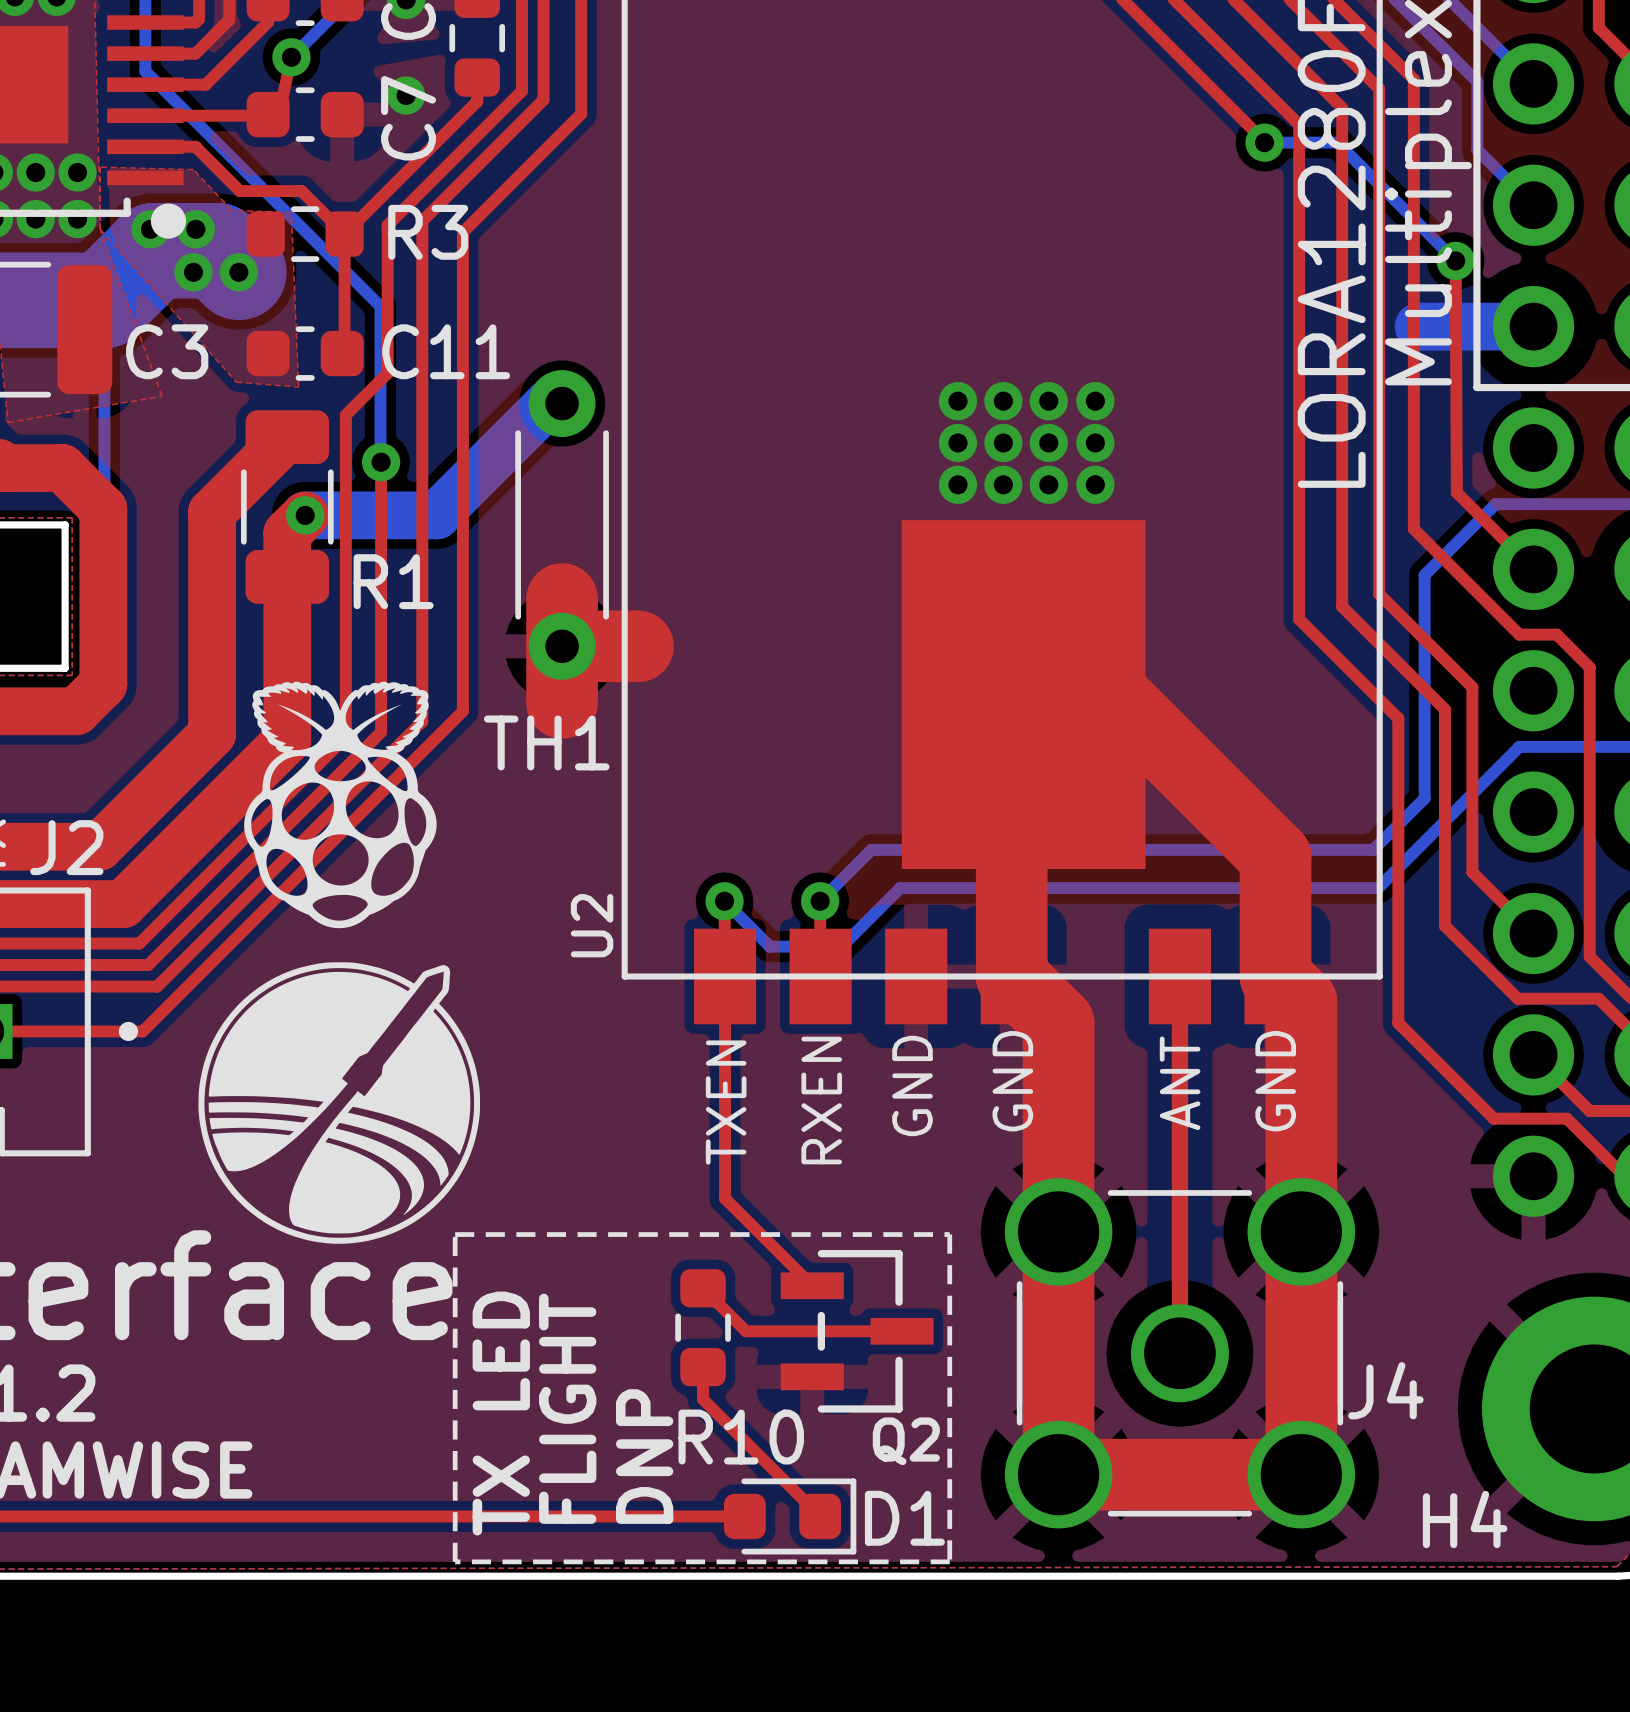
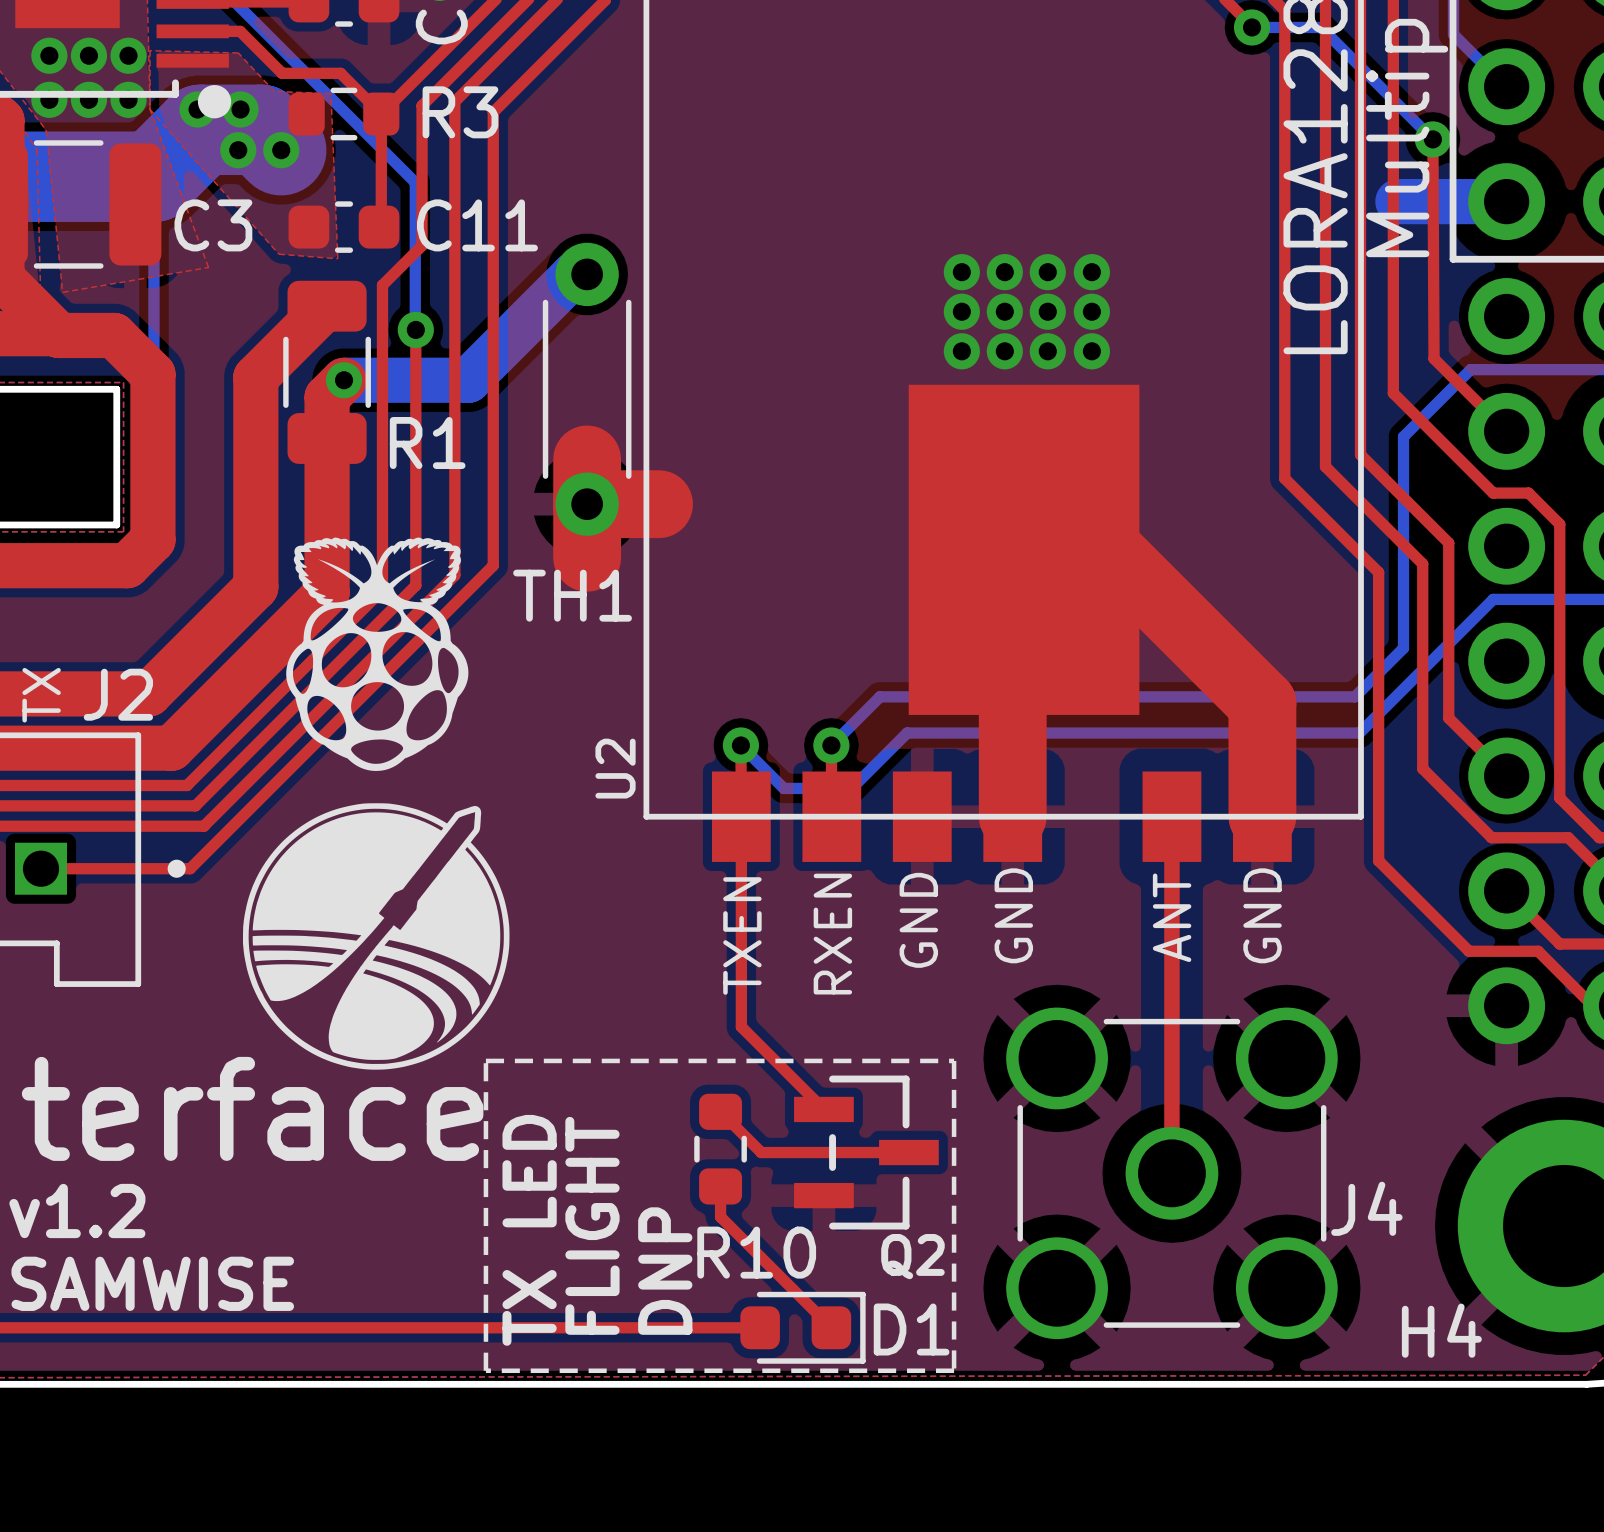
top track: (1011, 976) (1058, 1023) (1058, 1474) (1301, 1474) (1301, 1002) (1275, 976) -> none

